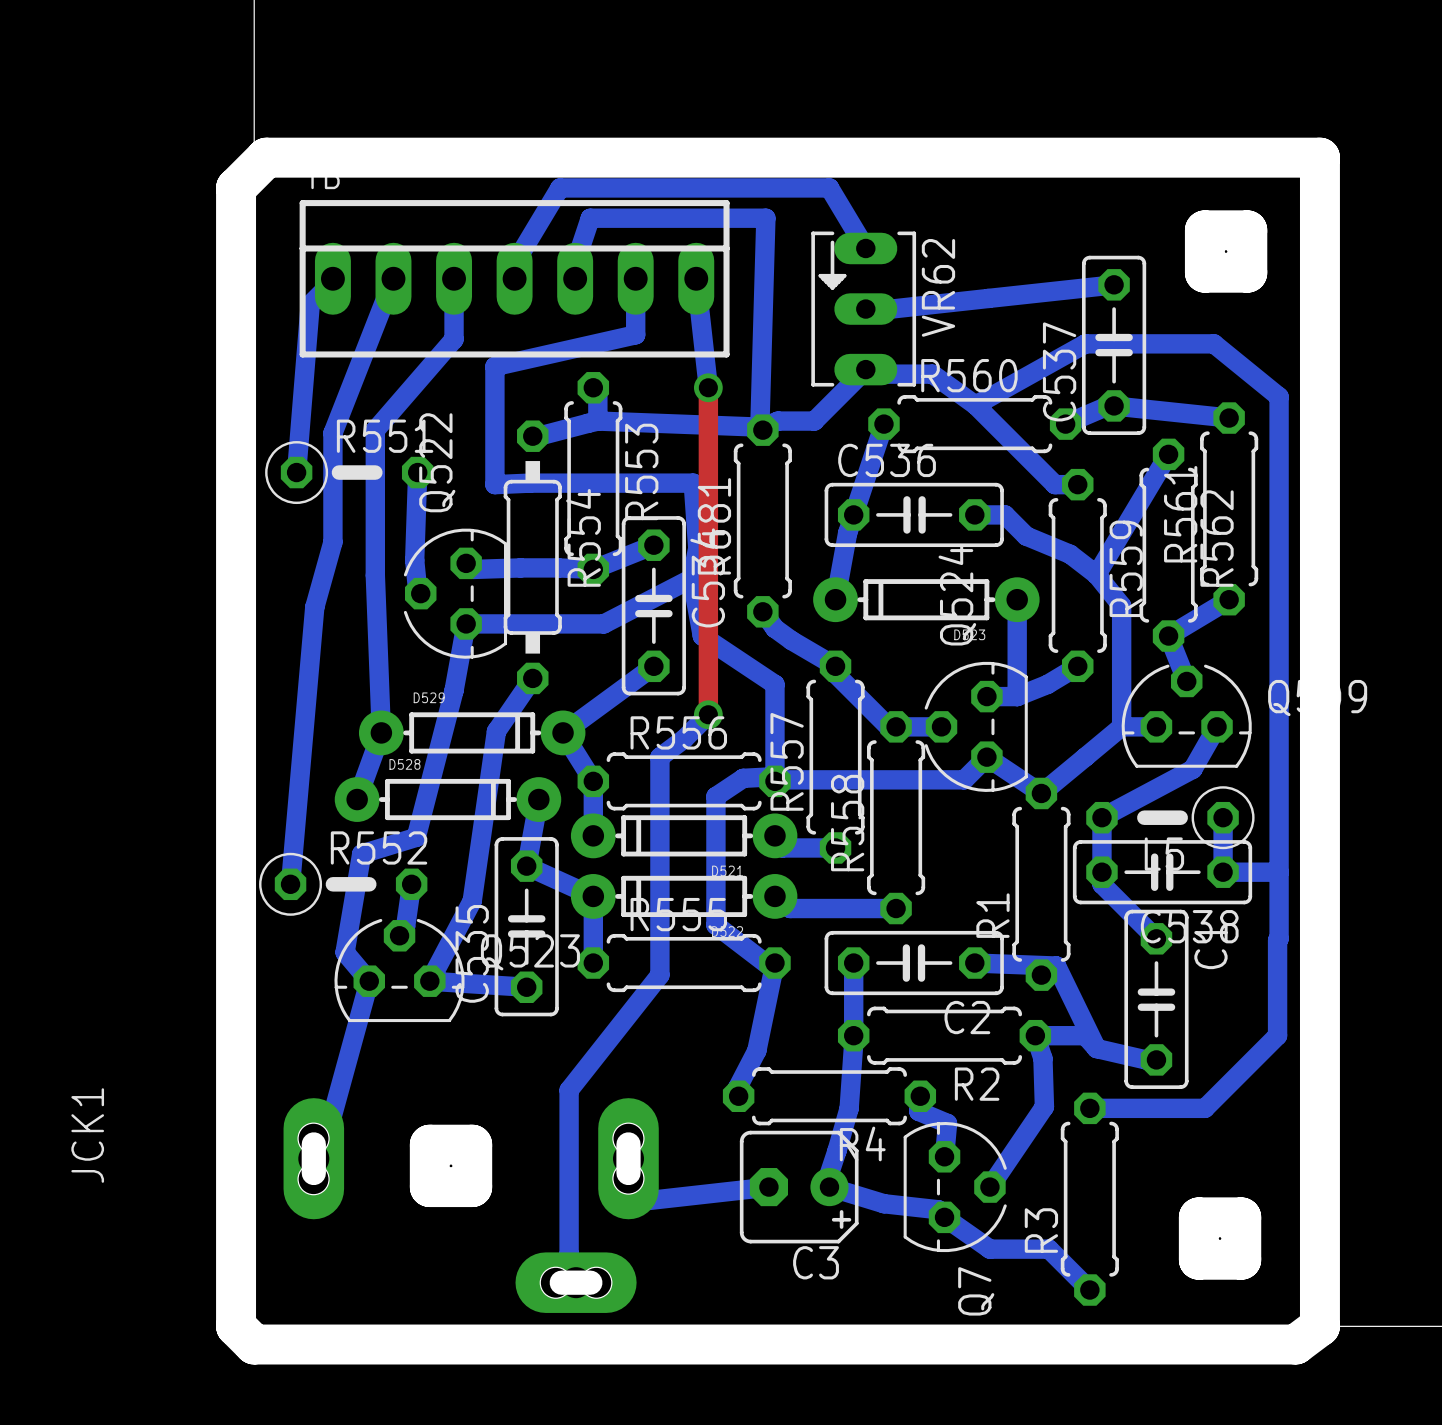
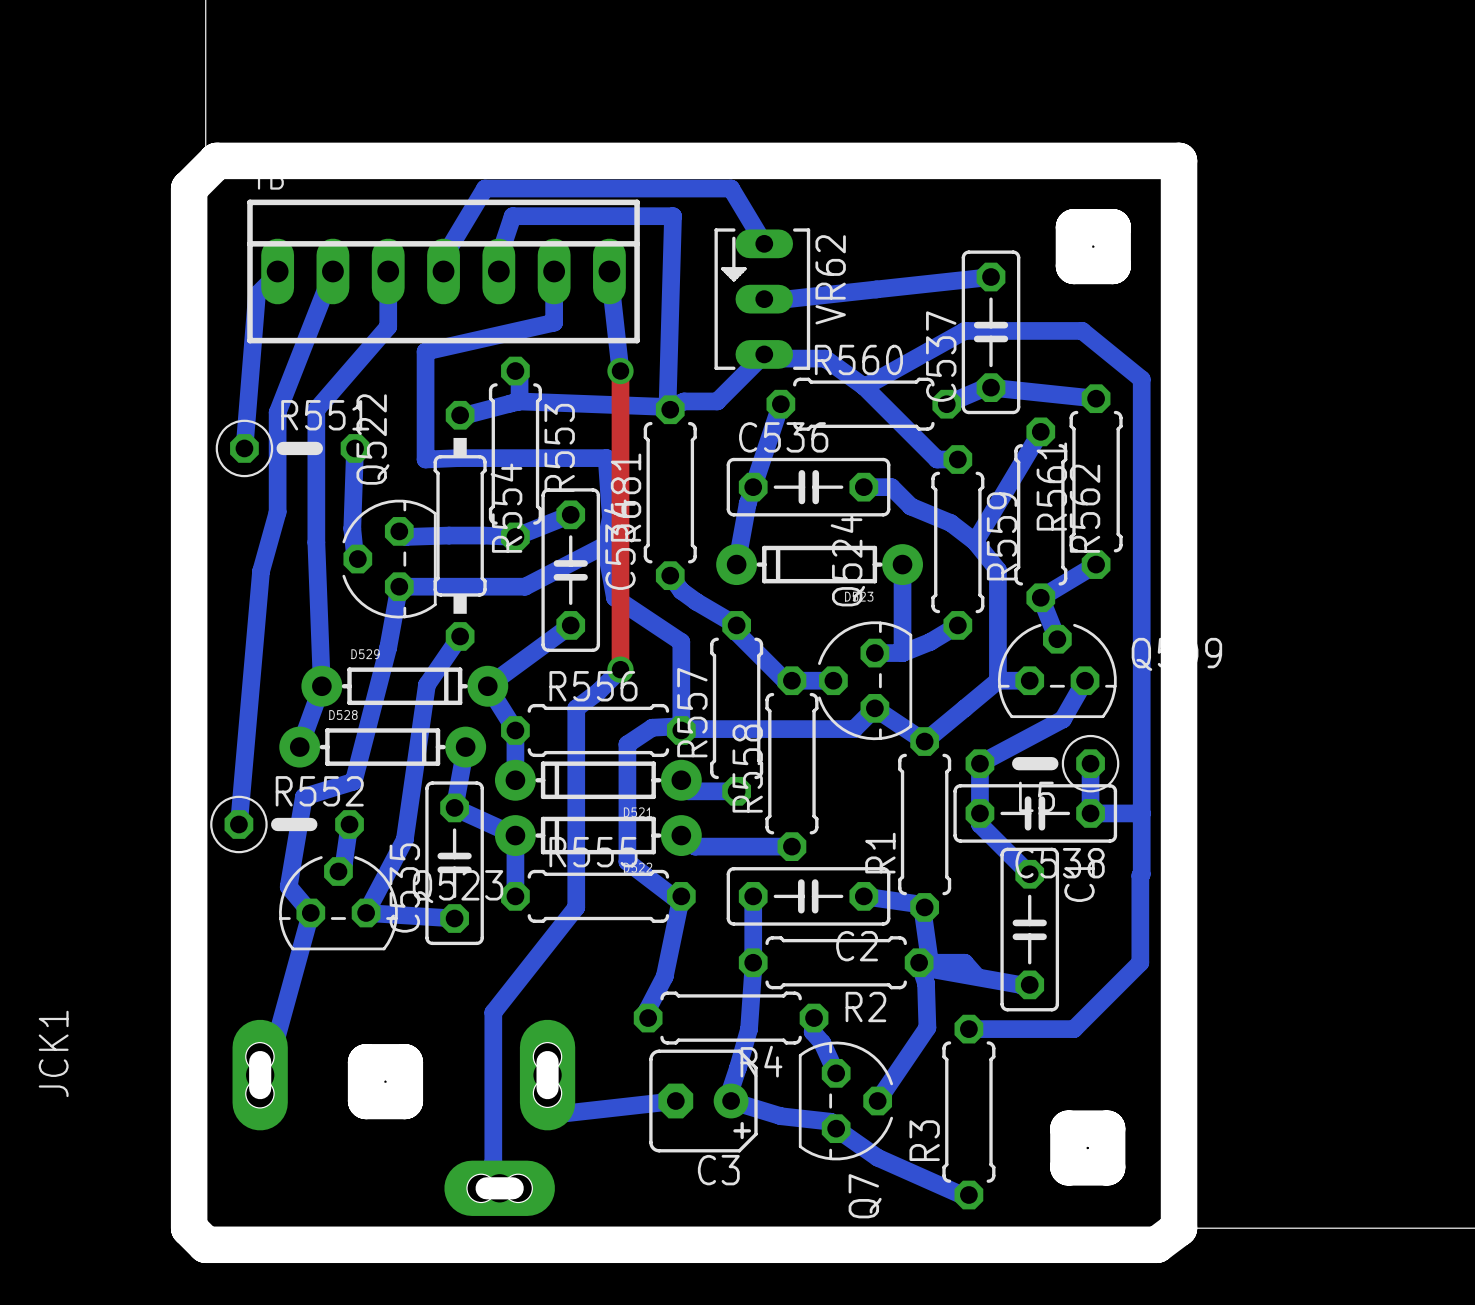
bottom track: (974, 963) (1056, 966) -> (863, 896) (921, 904)
bottom track: (1056, 966) (1096, 1048) (1145, 1059) -> (921, 904) (930, 968) (1020, 984)
bottom track: (918, 1111) (947, 1123) (944, 1156) -> (812, 1031) (822, 1042) (836, 1073)
bottom track: (989, 1249) (1048, 1249) (1089, 1290) -> (877, 1157) (964, 1196) (968, 1195)

